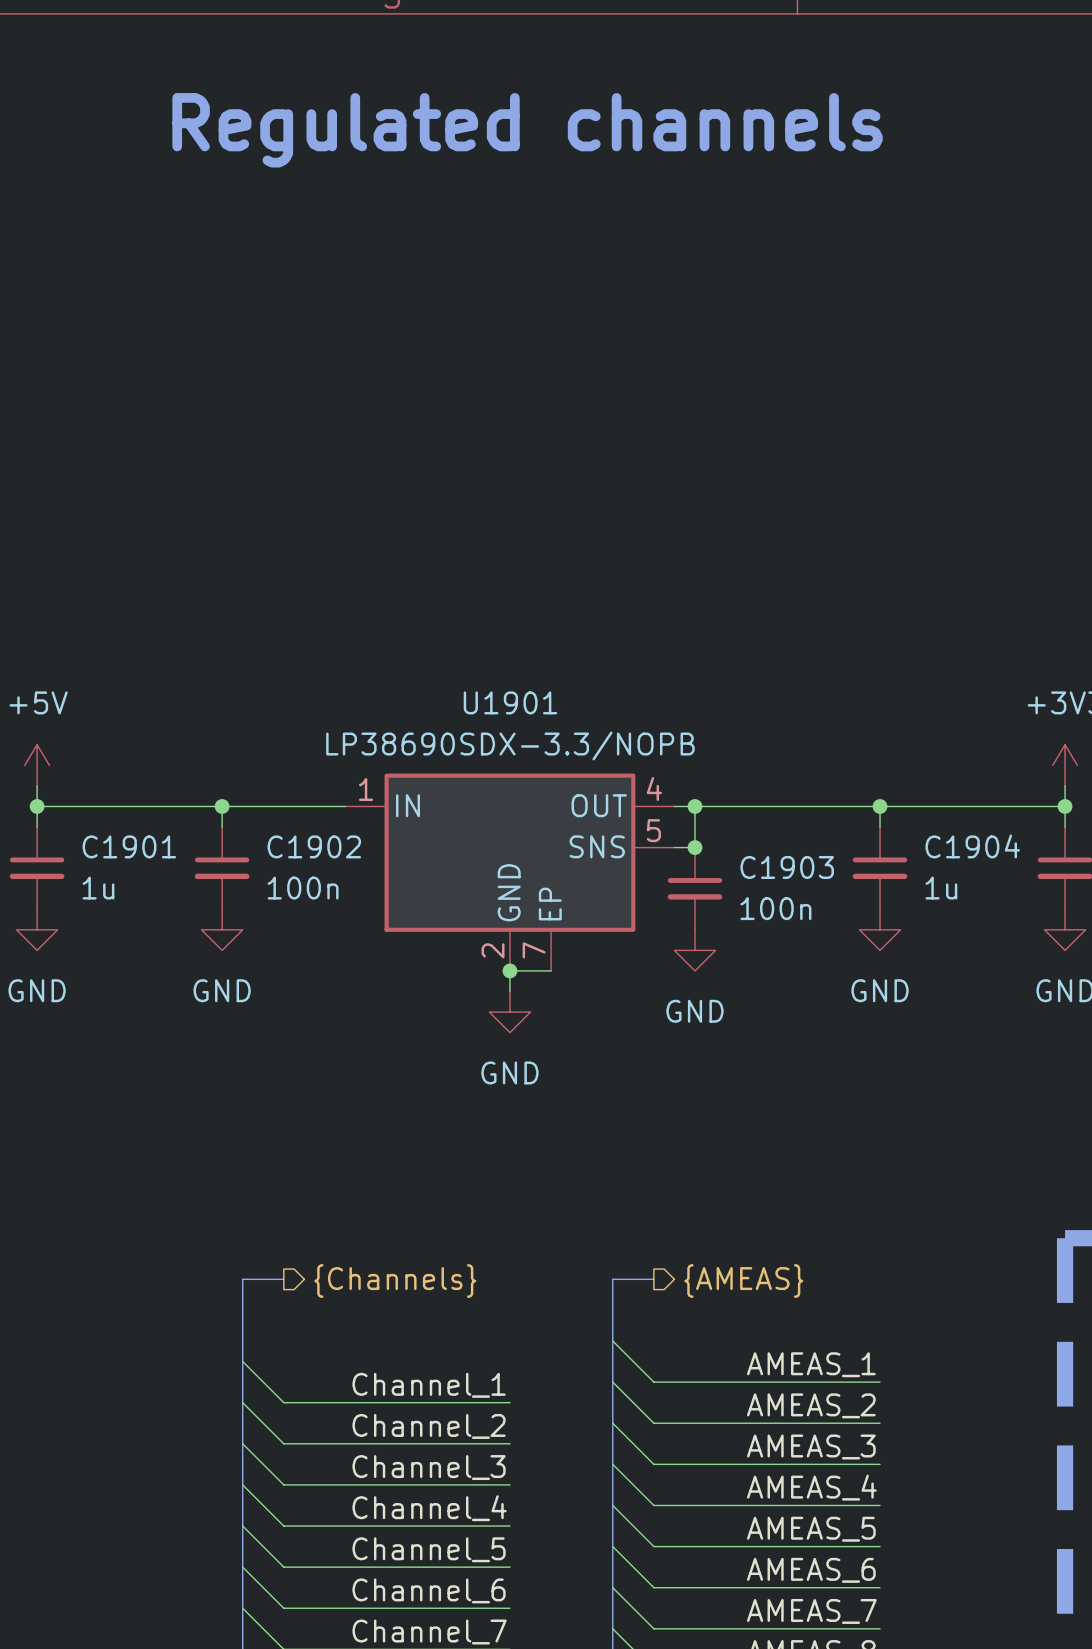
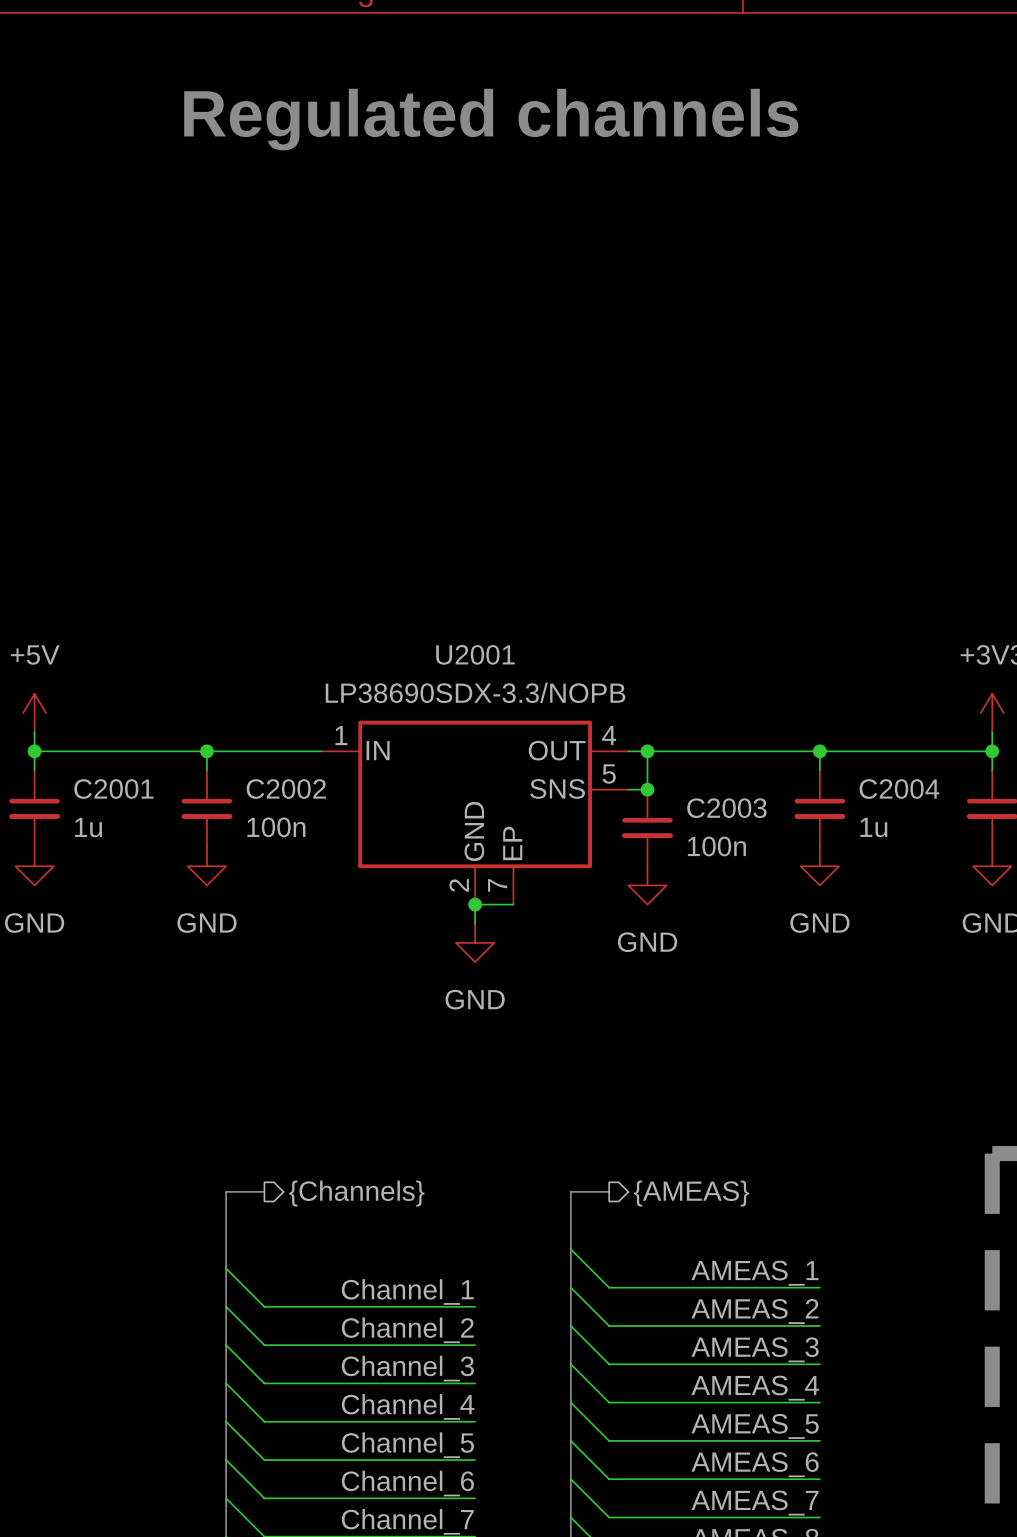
U1901 name: U1901 (510, 702) -> U2001 (475, 654)
C1901 name: C1901 (129, 846) -> C2001 (113, 789)
C1902 name: C1902 (314, 846) -> C2002 (286, 789)
C1904 name: C1904 (972, 846) -> C2004 (899, 789)
C1903 name: C1903 (787, 867) -> C2003 (726, 808)

